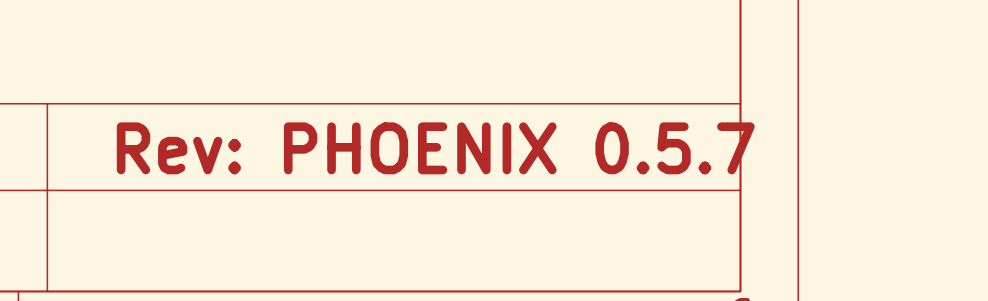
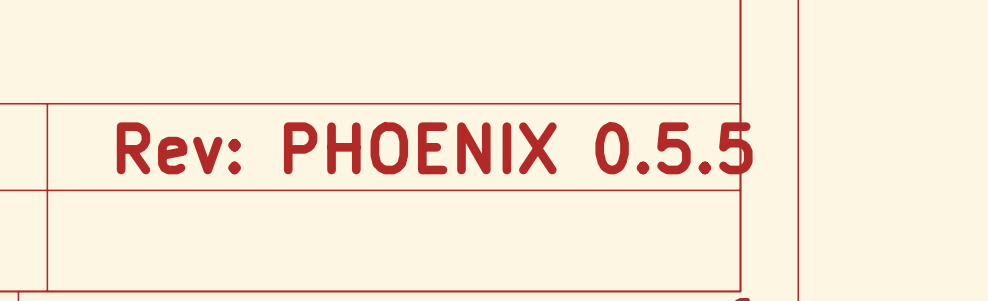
title block: Rev: PHOENIX 0.5.7 (435, 148) -> Rev: PHOENIX 0.5.5 (434, 148)

